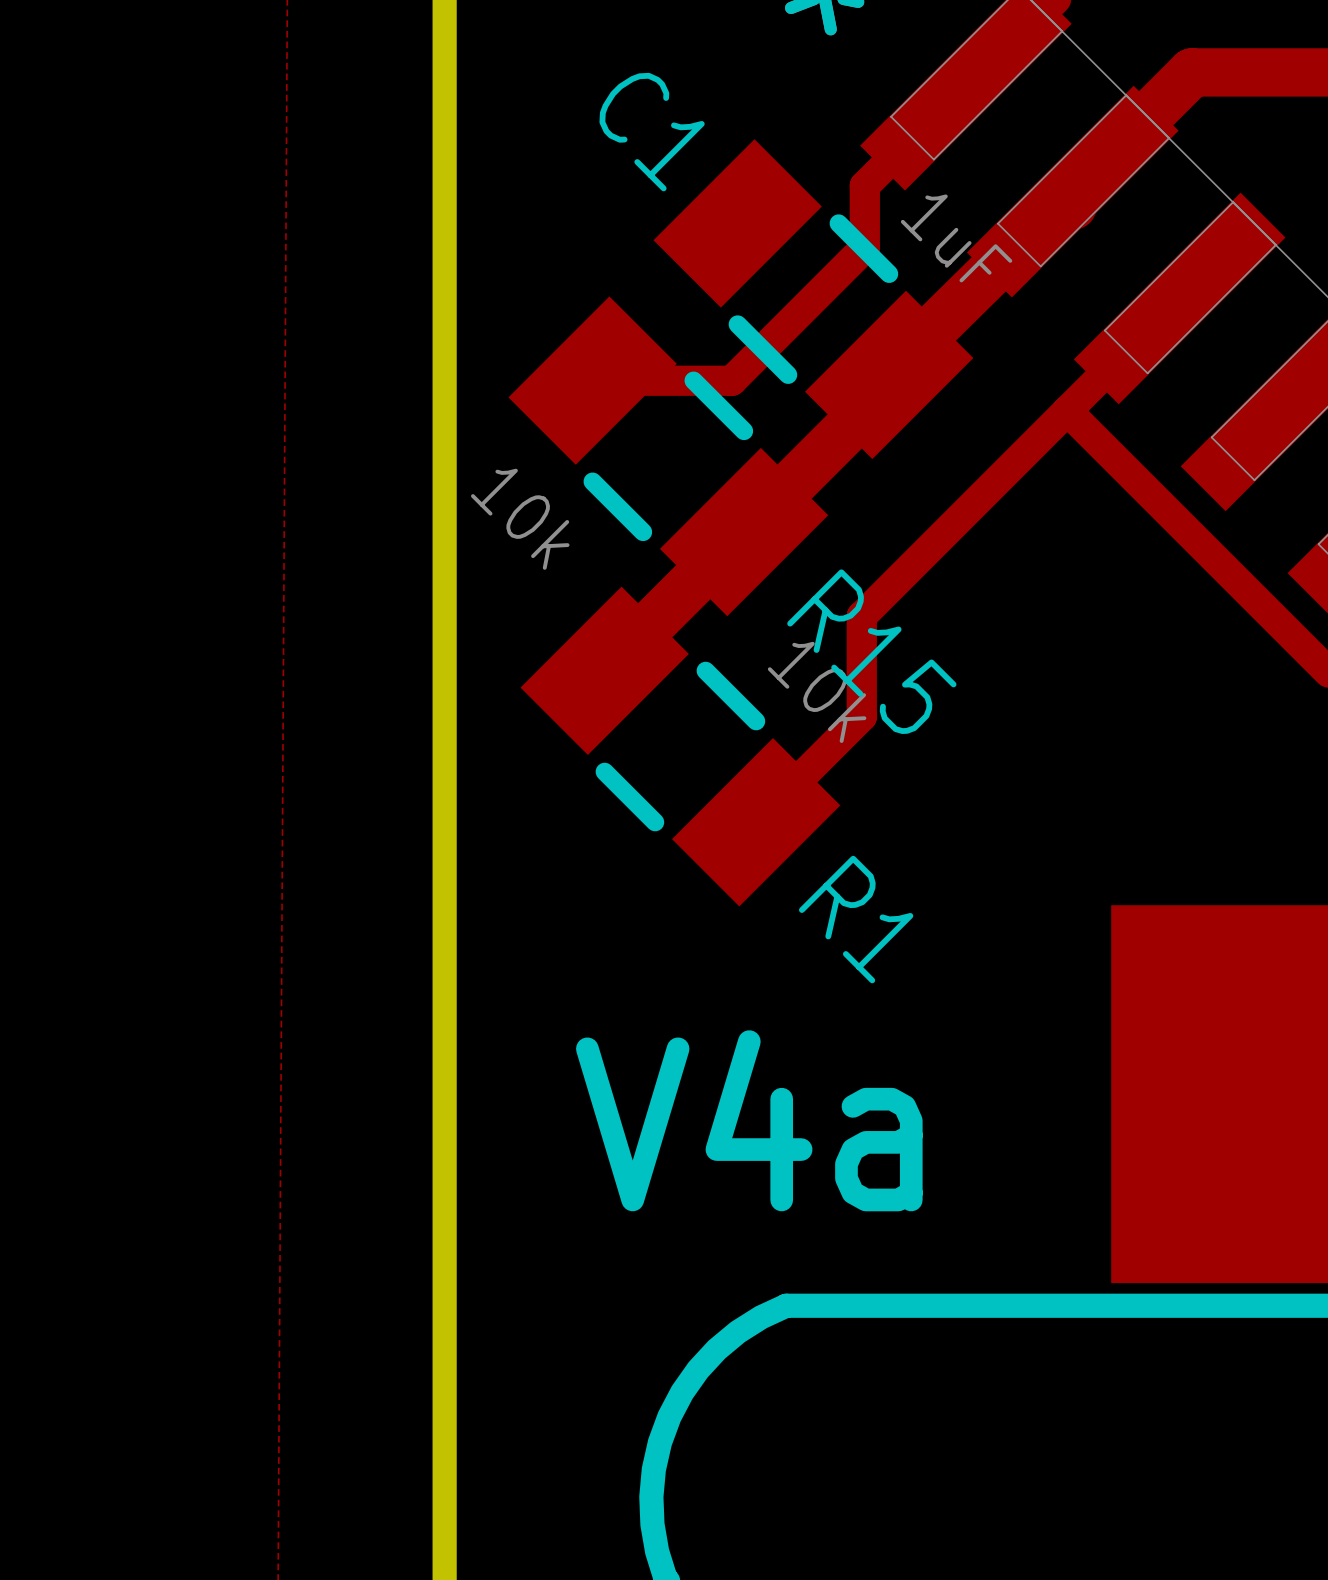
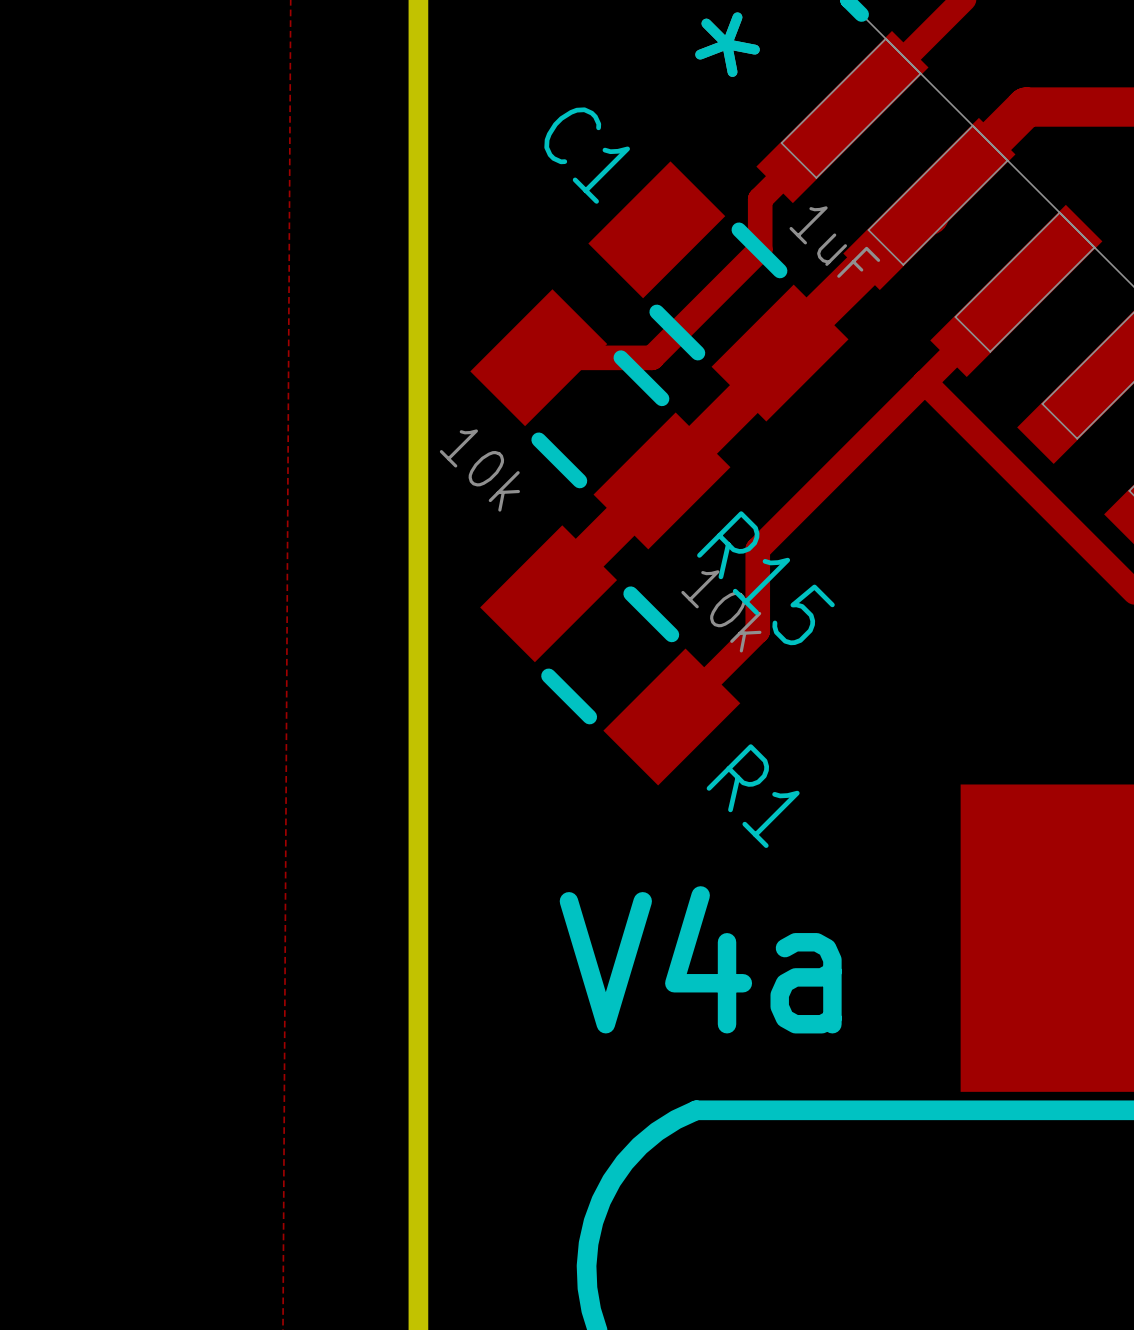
text position: V4a (749, 1120) -> V4a (700, 959)

